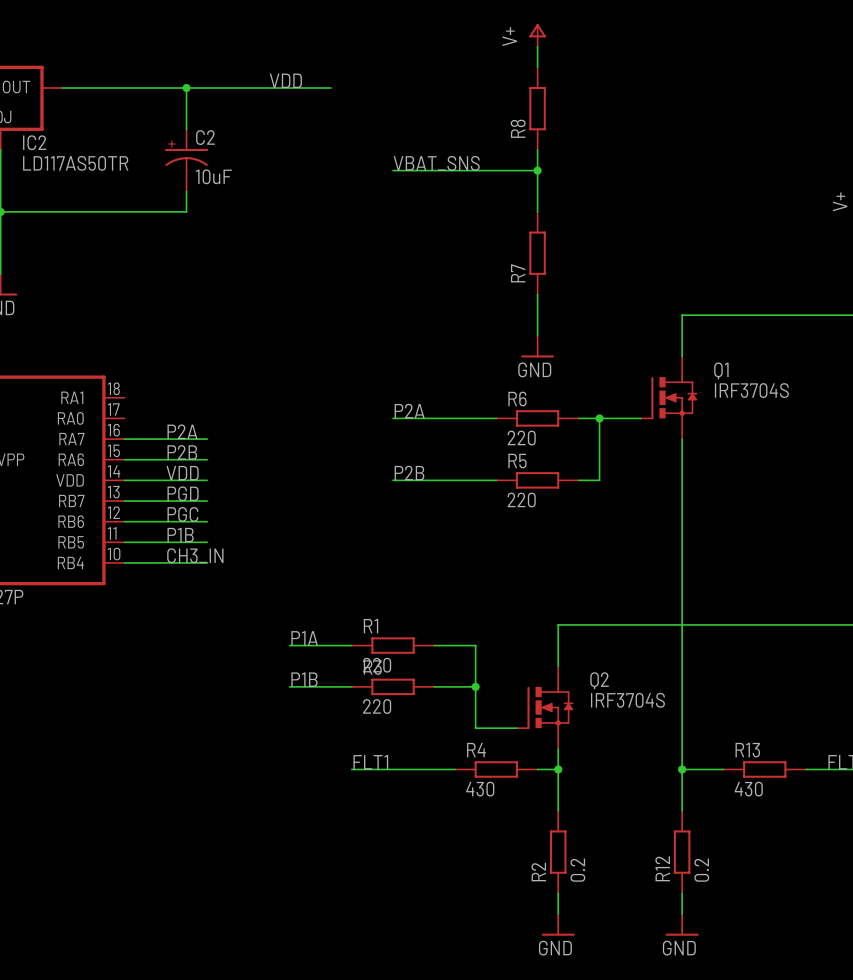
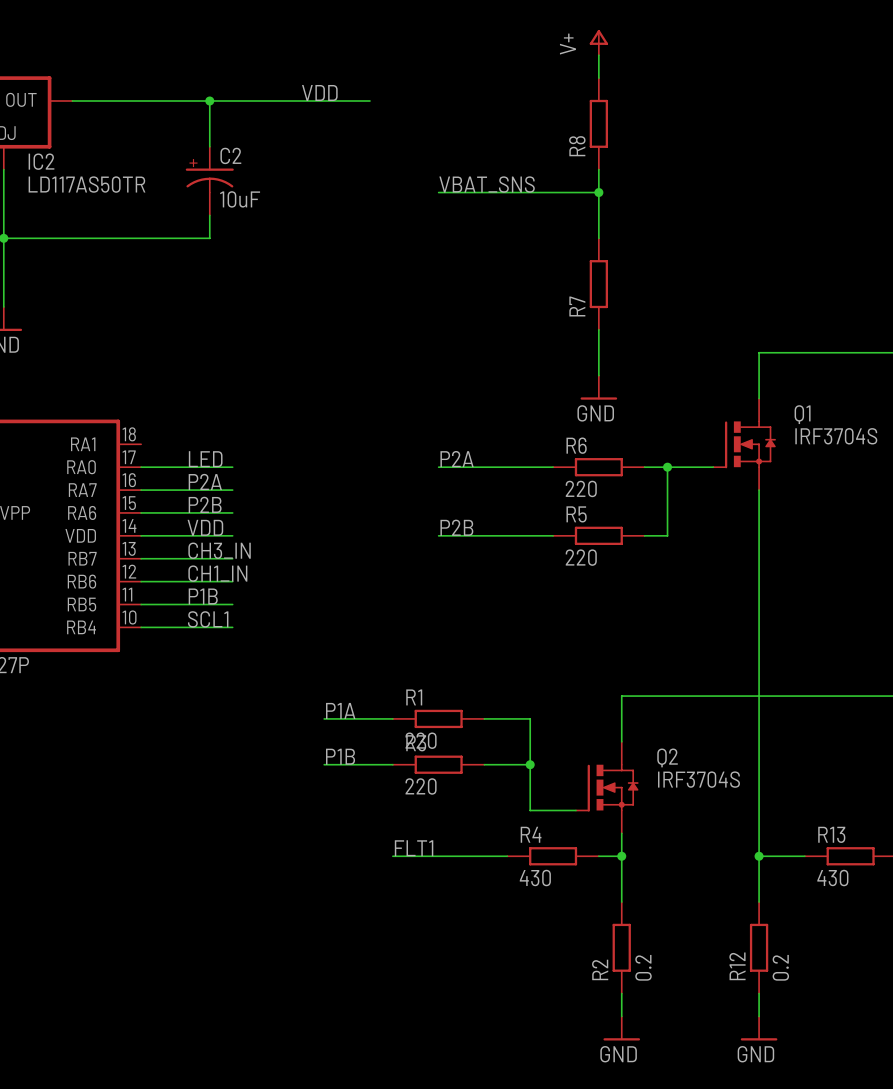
label: none -> LED (205, 459)
wire: none -> (141, 467) (232, 467)
label: PGD (183, 493) -> CH3_IN (219, 550)
label: PGC (182, 514) -> CH1_IN (217, 573)
label: CH3_IN (195, 555) -> SCL1 (208, 619)

